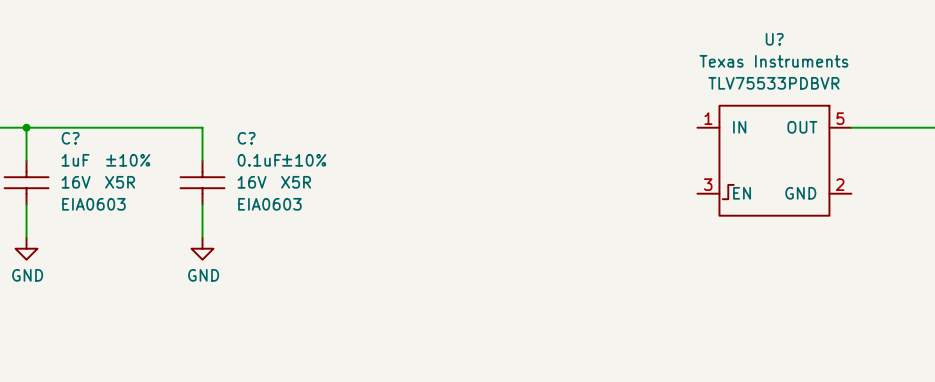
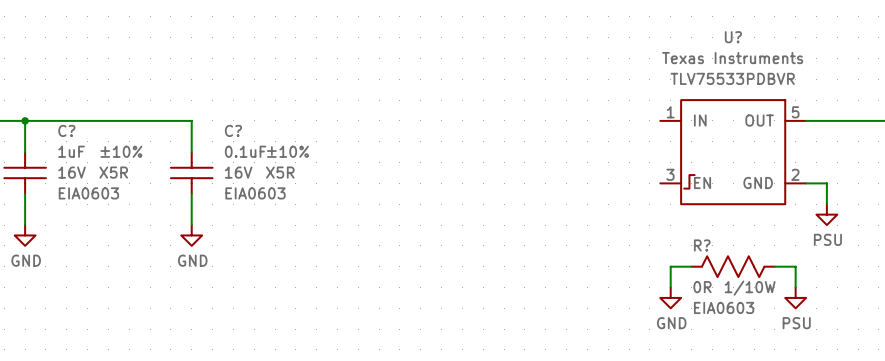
wire: none -> (806, 183) (826, 183) (826, 204)
power symbol: none -> PSU (826, 214)
wire: none -> (691, 266) (670, 266) (670, 287)
R?: none -> (733, 266)
wire: none -> (774, 266) (795, 266) (795, 287)
power symbol: none -> GND (670, 297)
power symbol: none -> PSU (795, 297)

